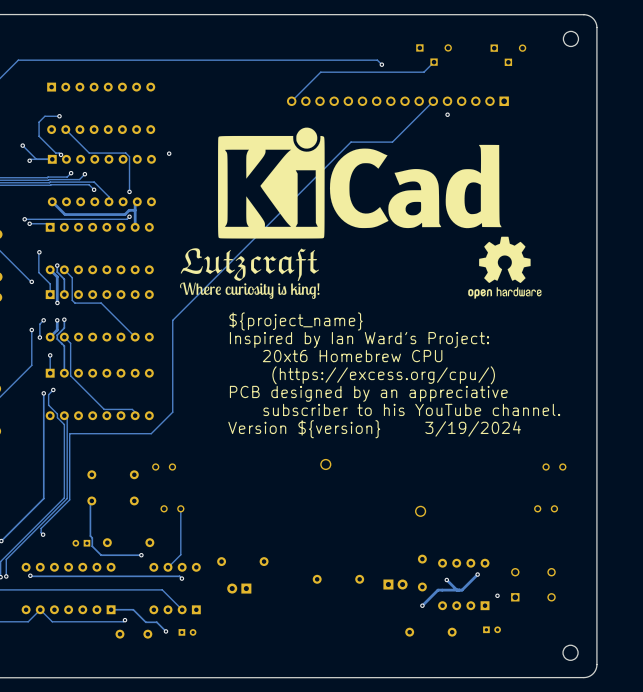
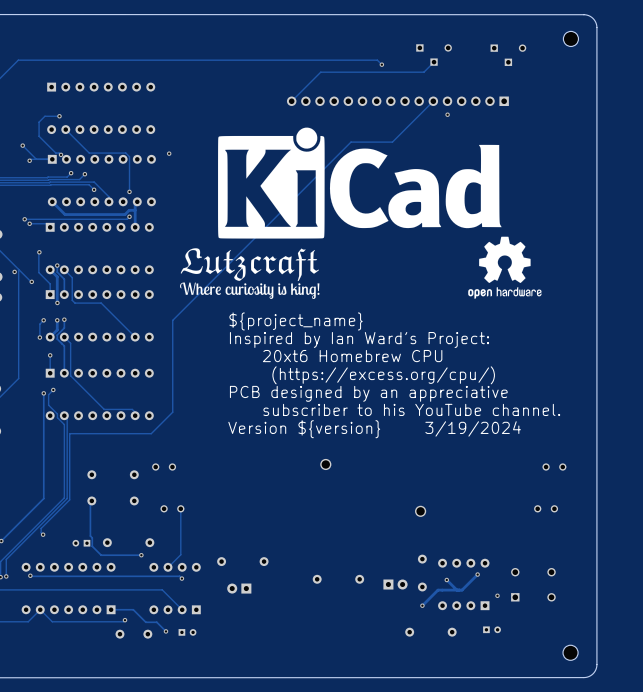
via: none -> (14, 271)
track: (31, 330) (31, 365) (18, 378) -> (18, 269) (18, 378)
via: (31, 330) -> none

